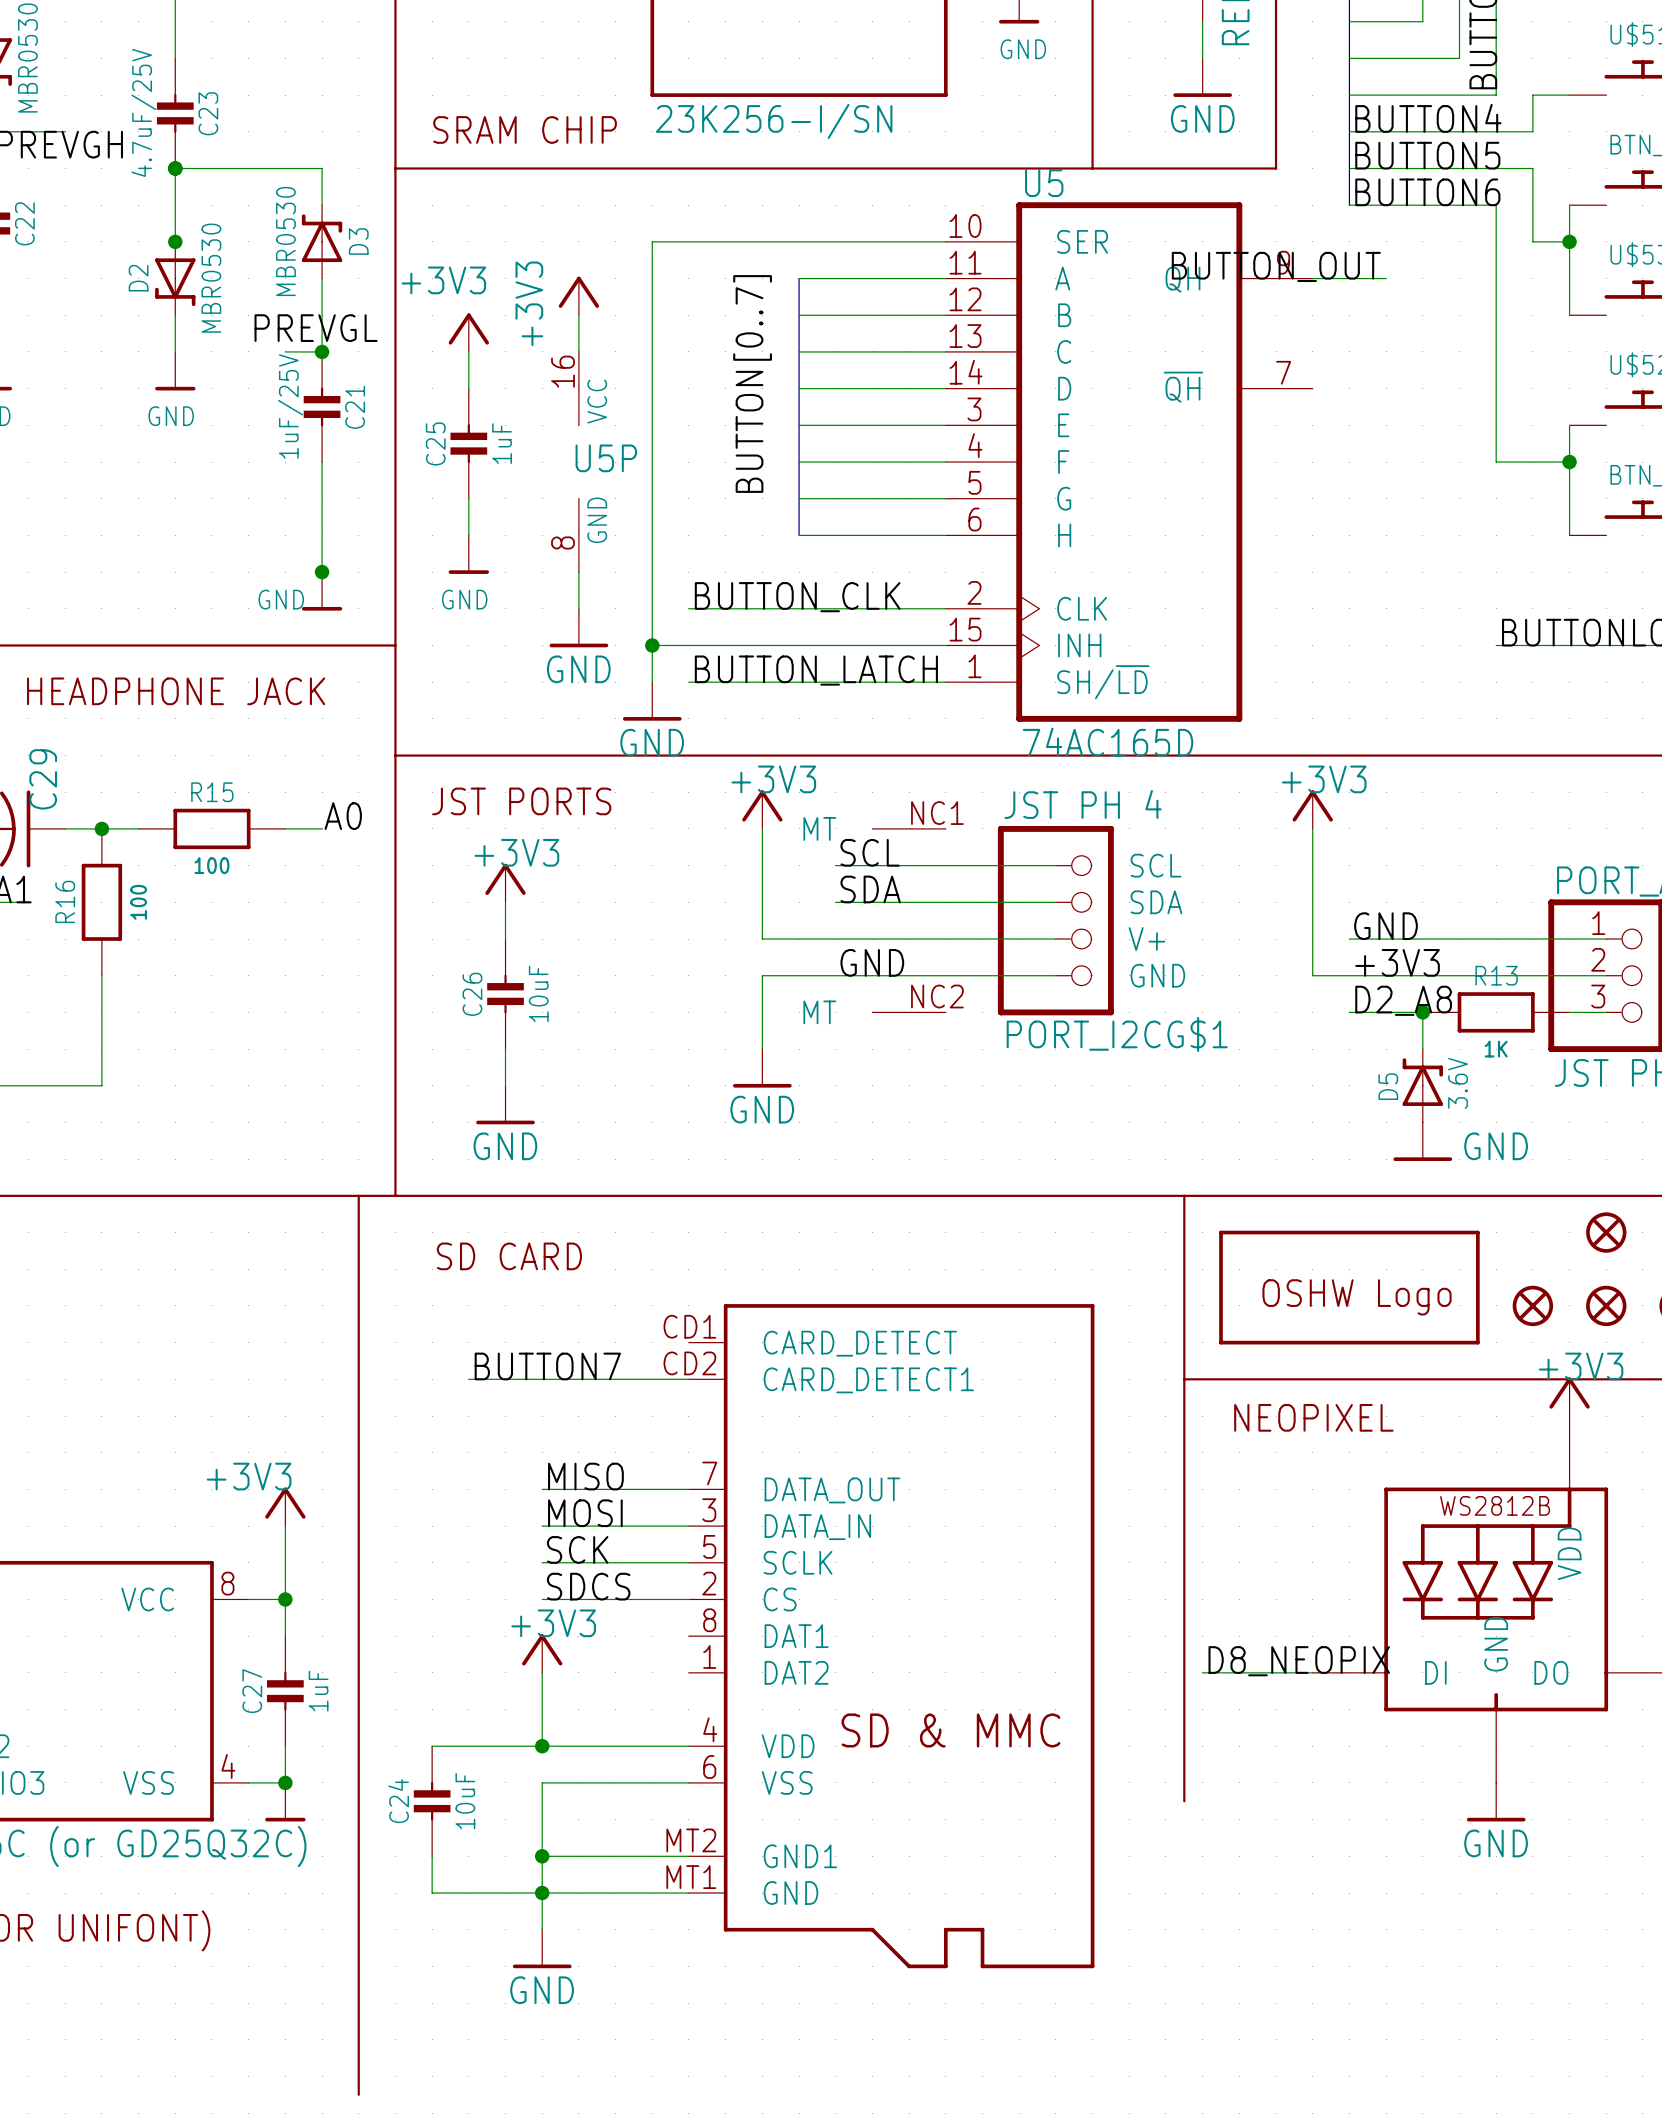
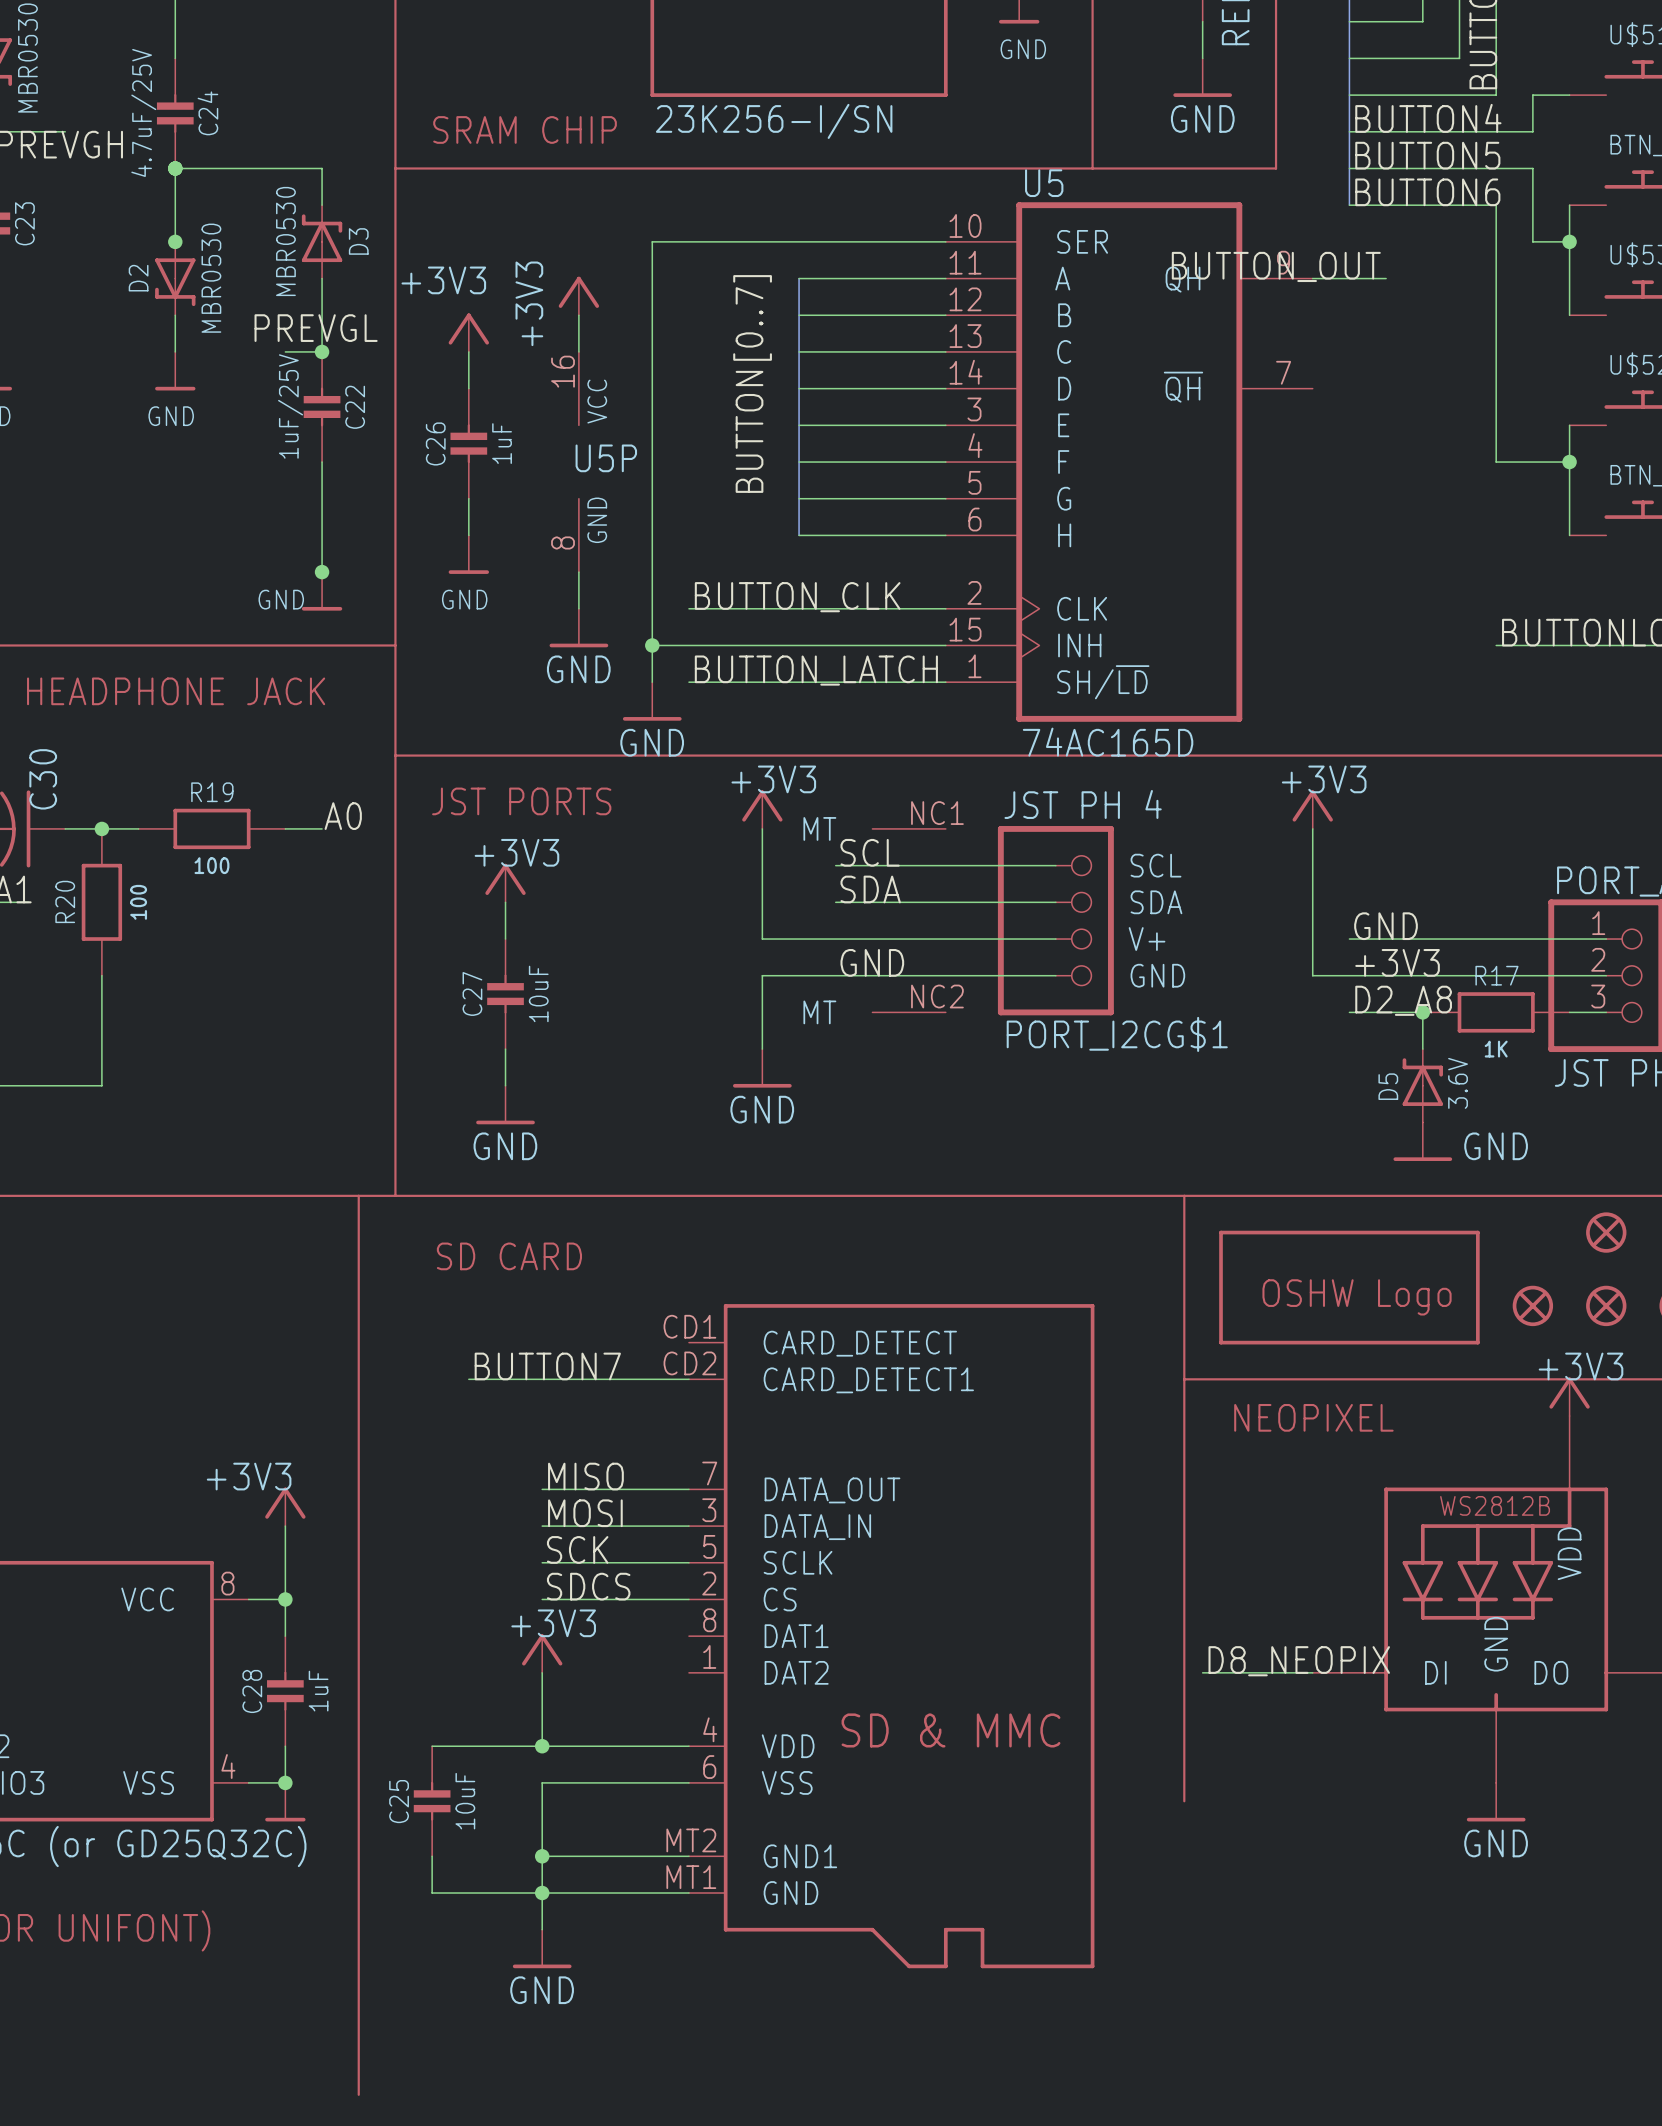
C23 name: C23 (208, 113) -> C24 (207, 113)
C22 name: C22 (24, 223) -> C23 (24, 223)
C21 name: C21 (355, 407) -> C22 (355, 407)
C25 name: C25 (435, 443) -> C26 (435, 443)
C29 name: C29 (43, 779) -> C30 (43, 779)
R15 name: R15 (212, 792) -> R19 (212, 792)
R16 name: R16 (65, 901) -> R20 (65, 901)
R13 name: R13 (1496, 975) -> R17 (1496, 975)
C26 name: C26 (472, 994) -> C27 (472, 993)
C27 name: C27 (252, 1691) -> C28 (252, 1691)
C24 name: C24 (398, 1801) -> C25 (399, 1801)

